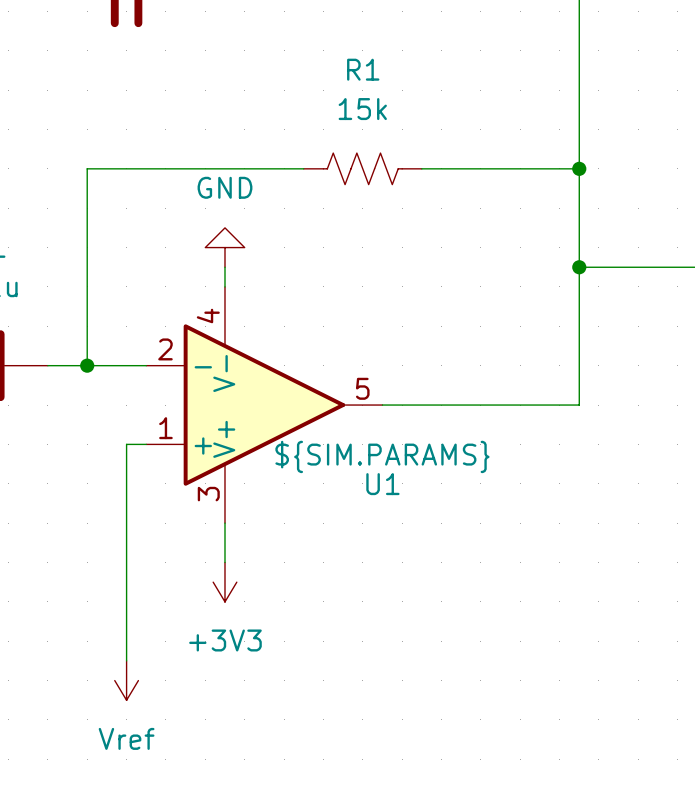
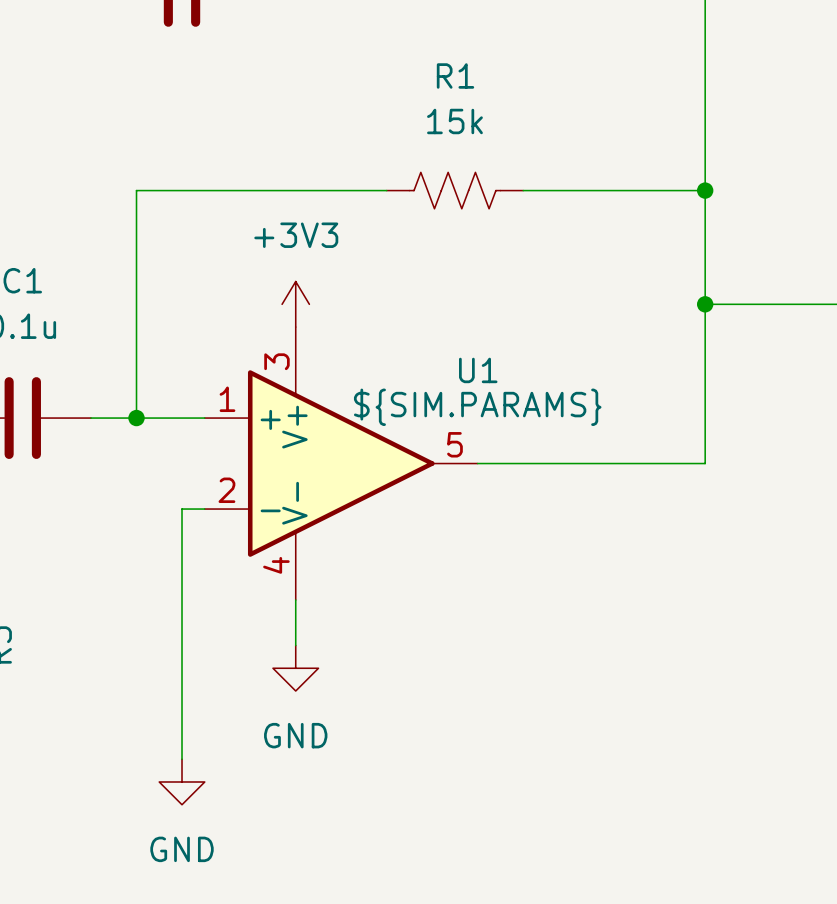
power symbol: GND (224, 247) -> none
power symbol: none -> +3V3 (295, 304)
U1 flip: as is (264, 405) -> up-down (341, 463)
power symbol: +3V3 (224, 582) -> GND (295, 668)
power symbol: Vref (126, 680) -> GND (182, 781)

